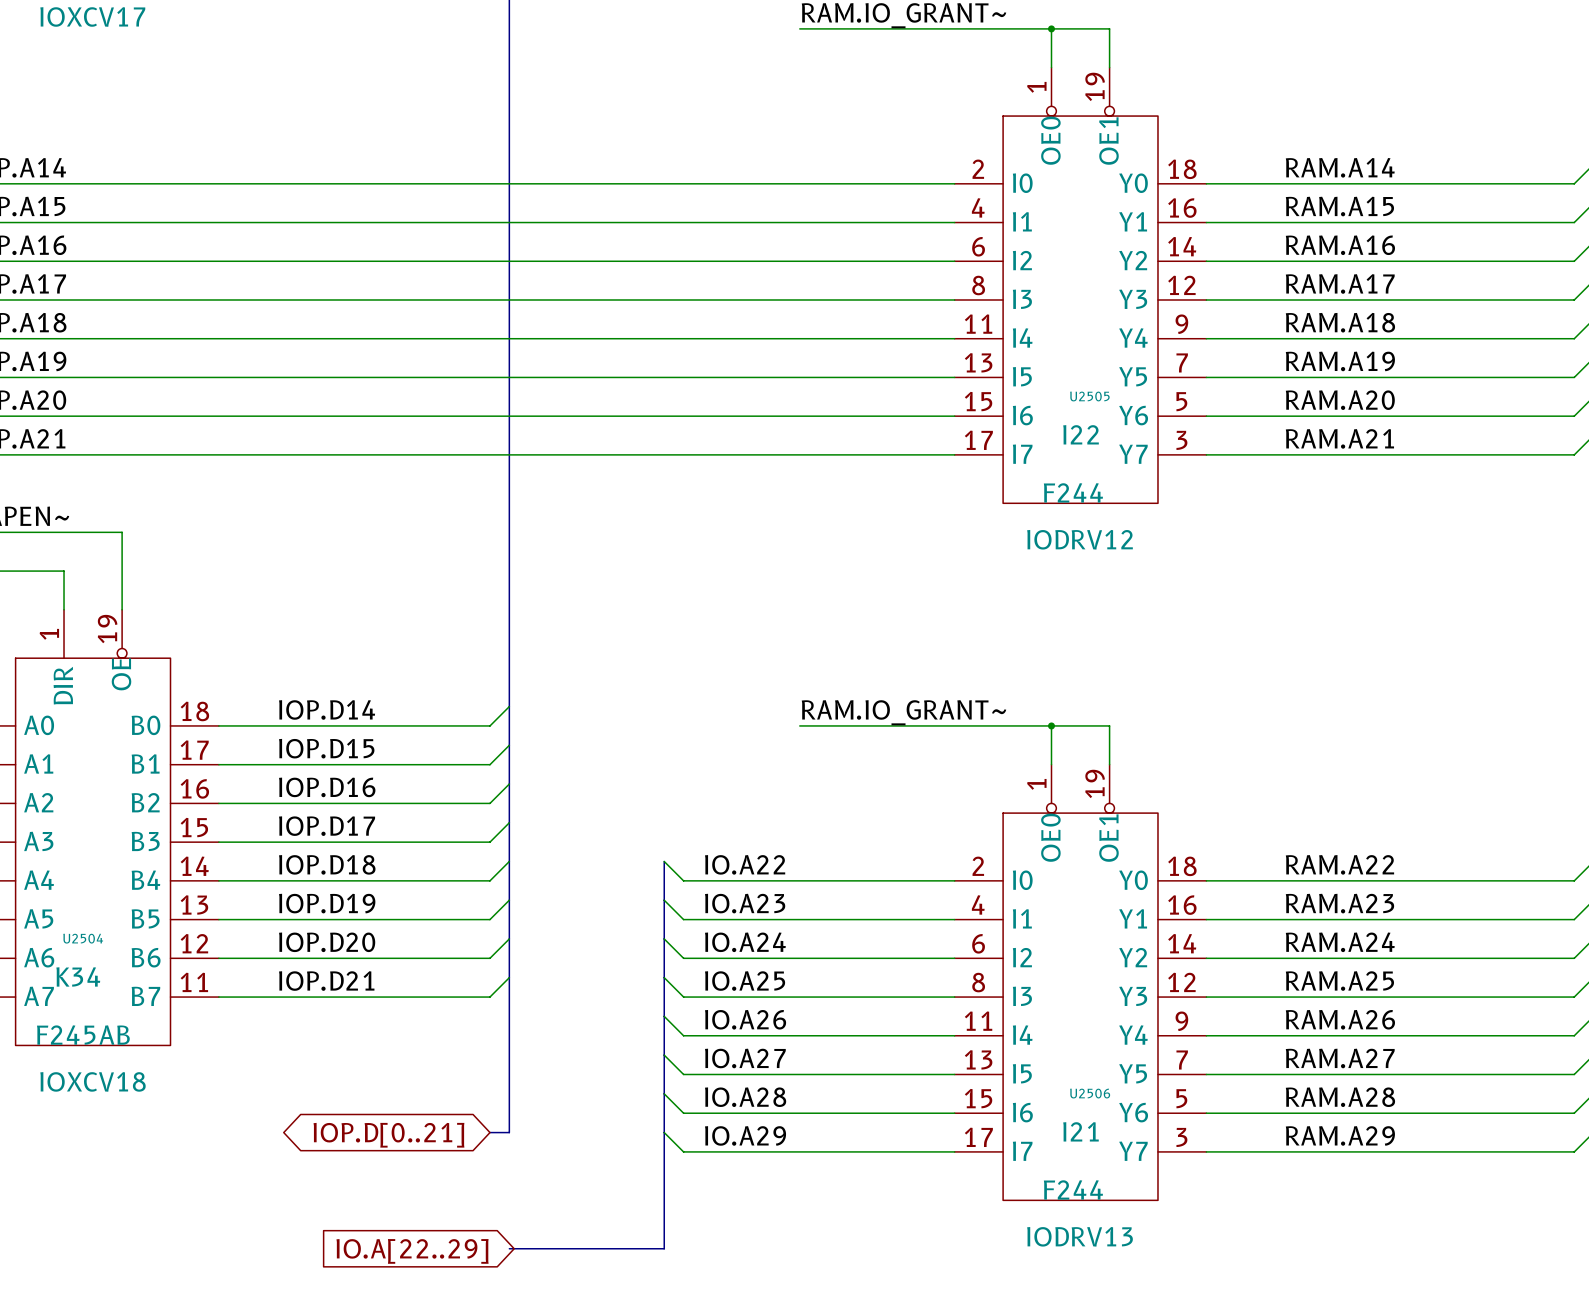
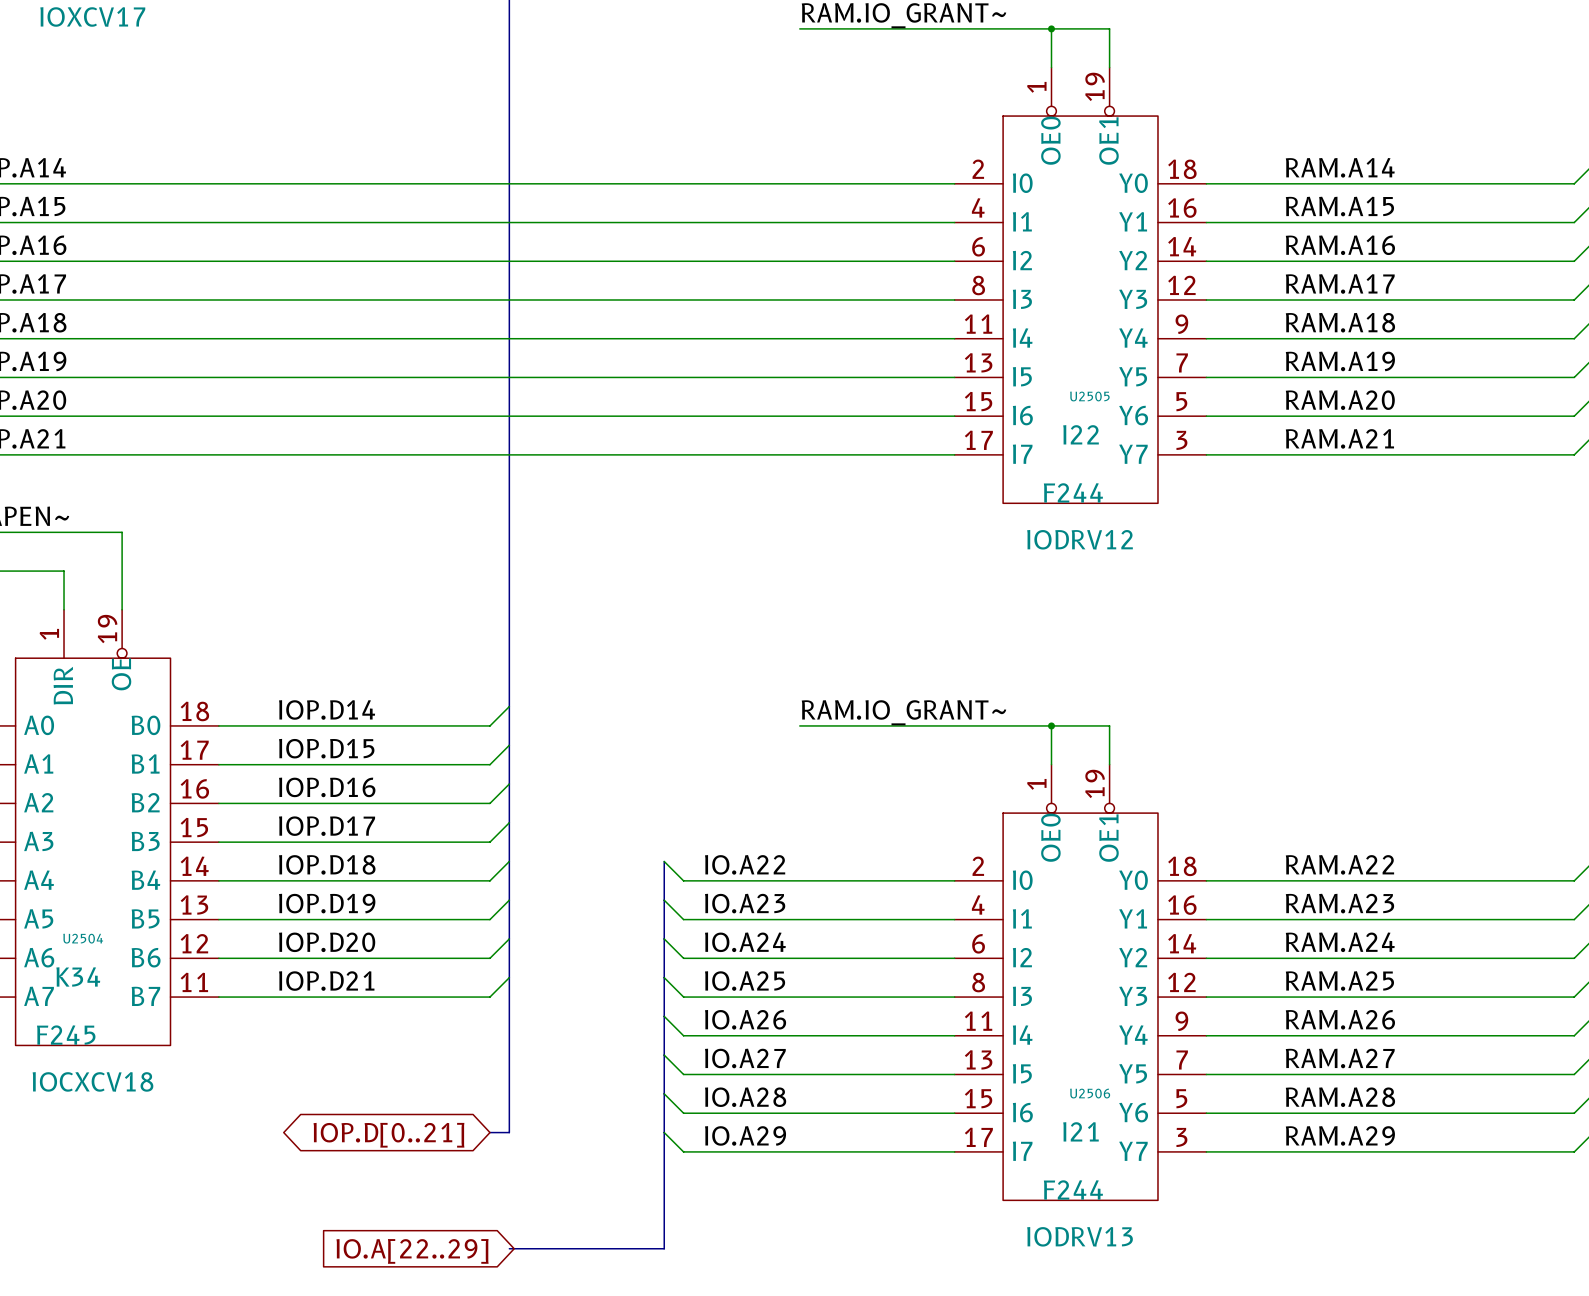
U2504 value: F245AB (83, 1035) -> F245 (66, 1035)
U2504 text: IOXCV18 (93, 1081) -> IOCXCV18 (93, 1081)

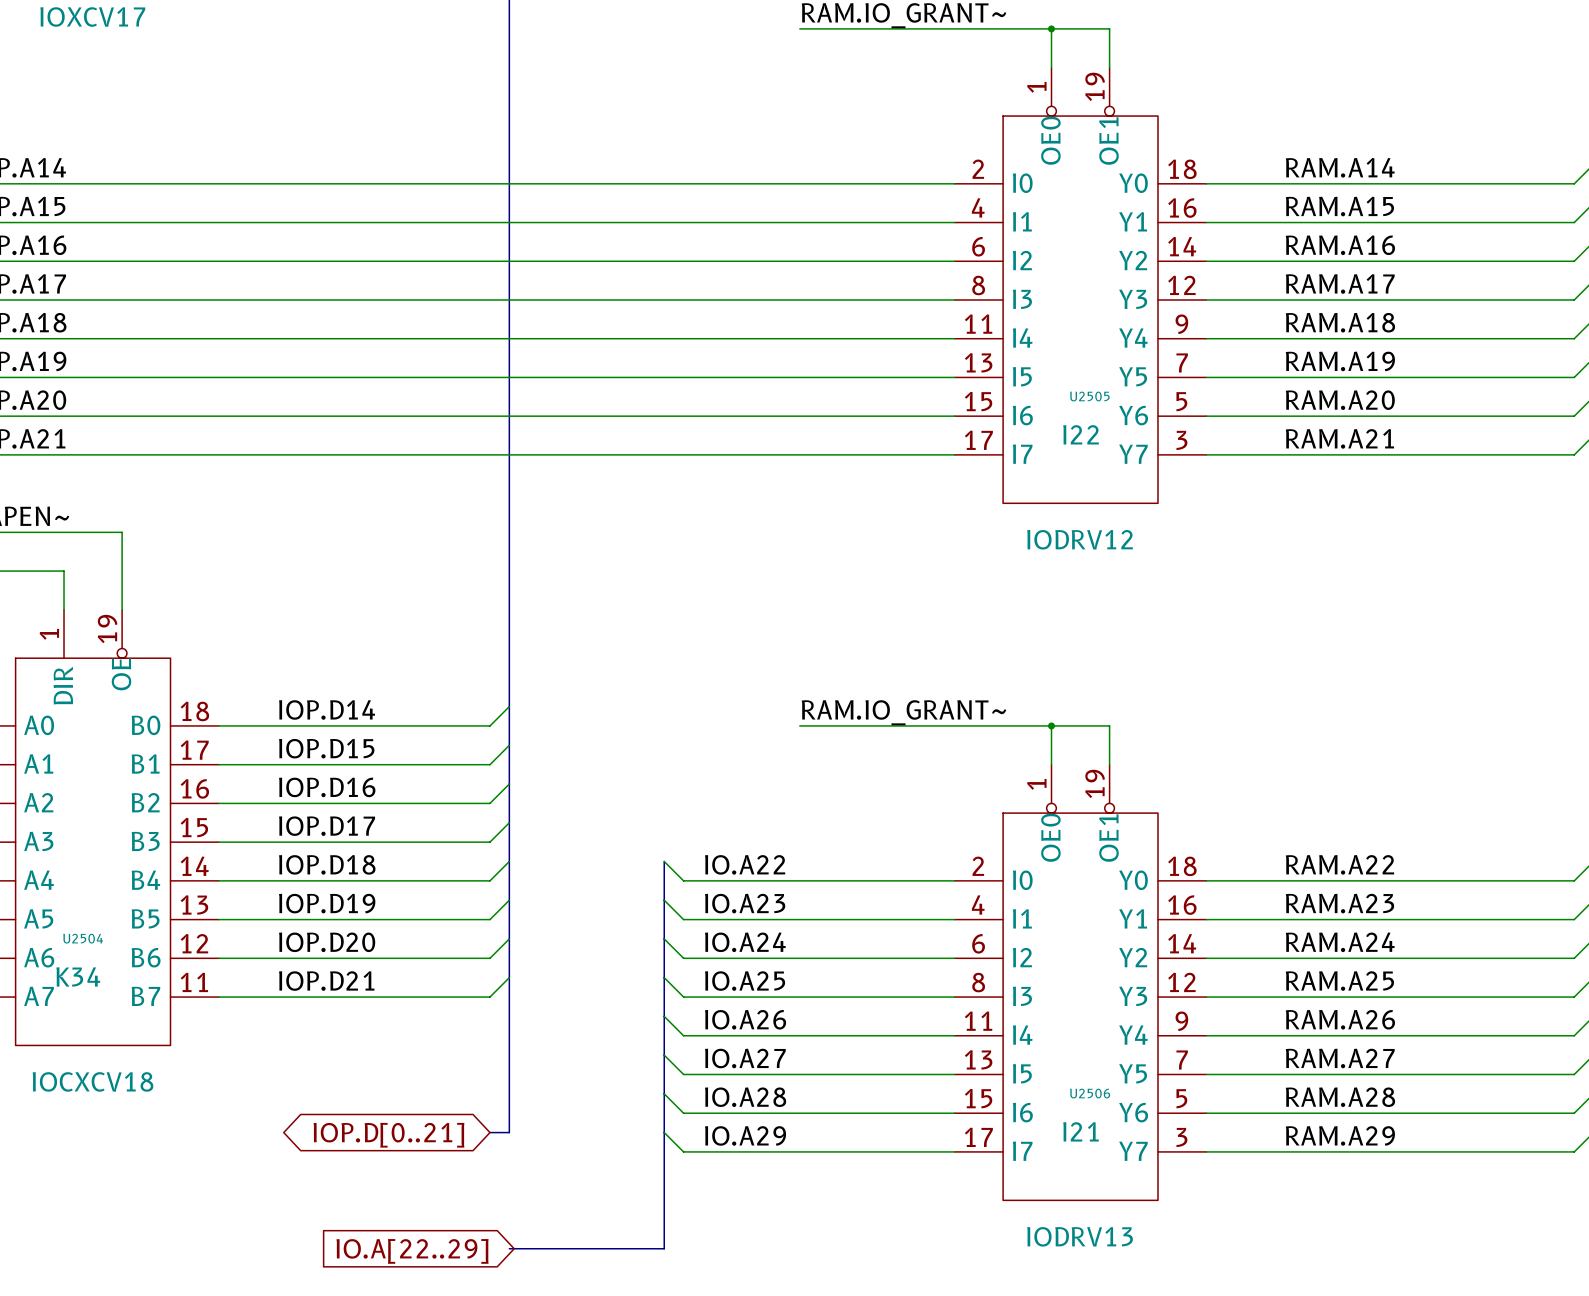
U2505 value: F244 (1073, 492) -> none
U2504 value: F245 (66, 1035) -> none
U2506 value: F244 (1073, 1189) -> none

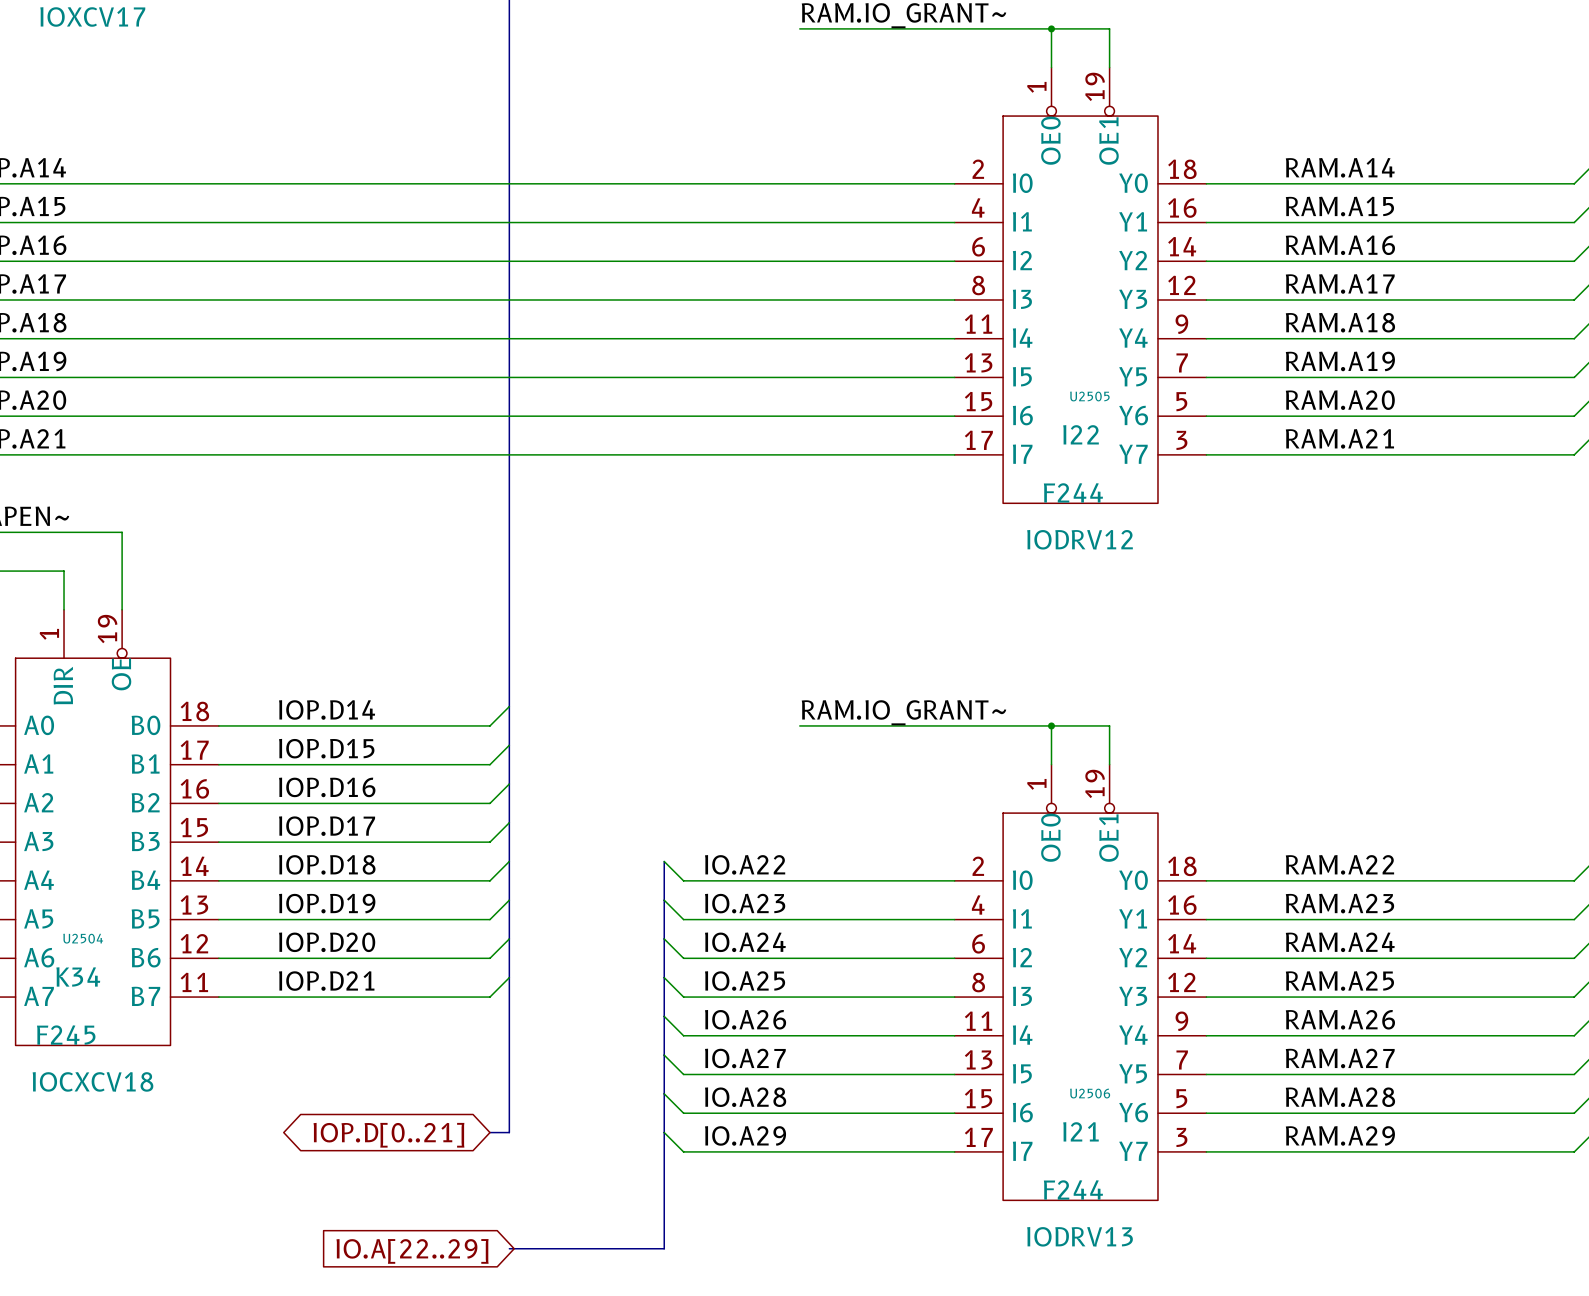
U2505 value: none -> F244 (1073, 492)
U2504 value: none -> F245 (66, 1035)
U2506 value: none -> F244 (1073, 1189)

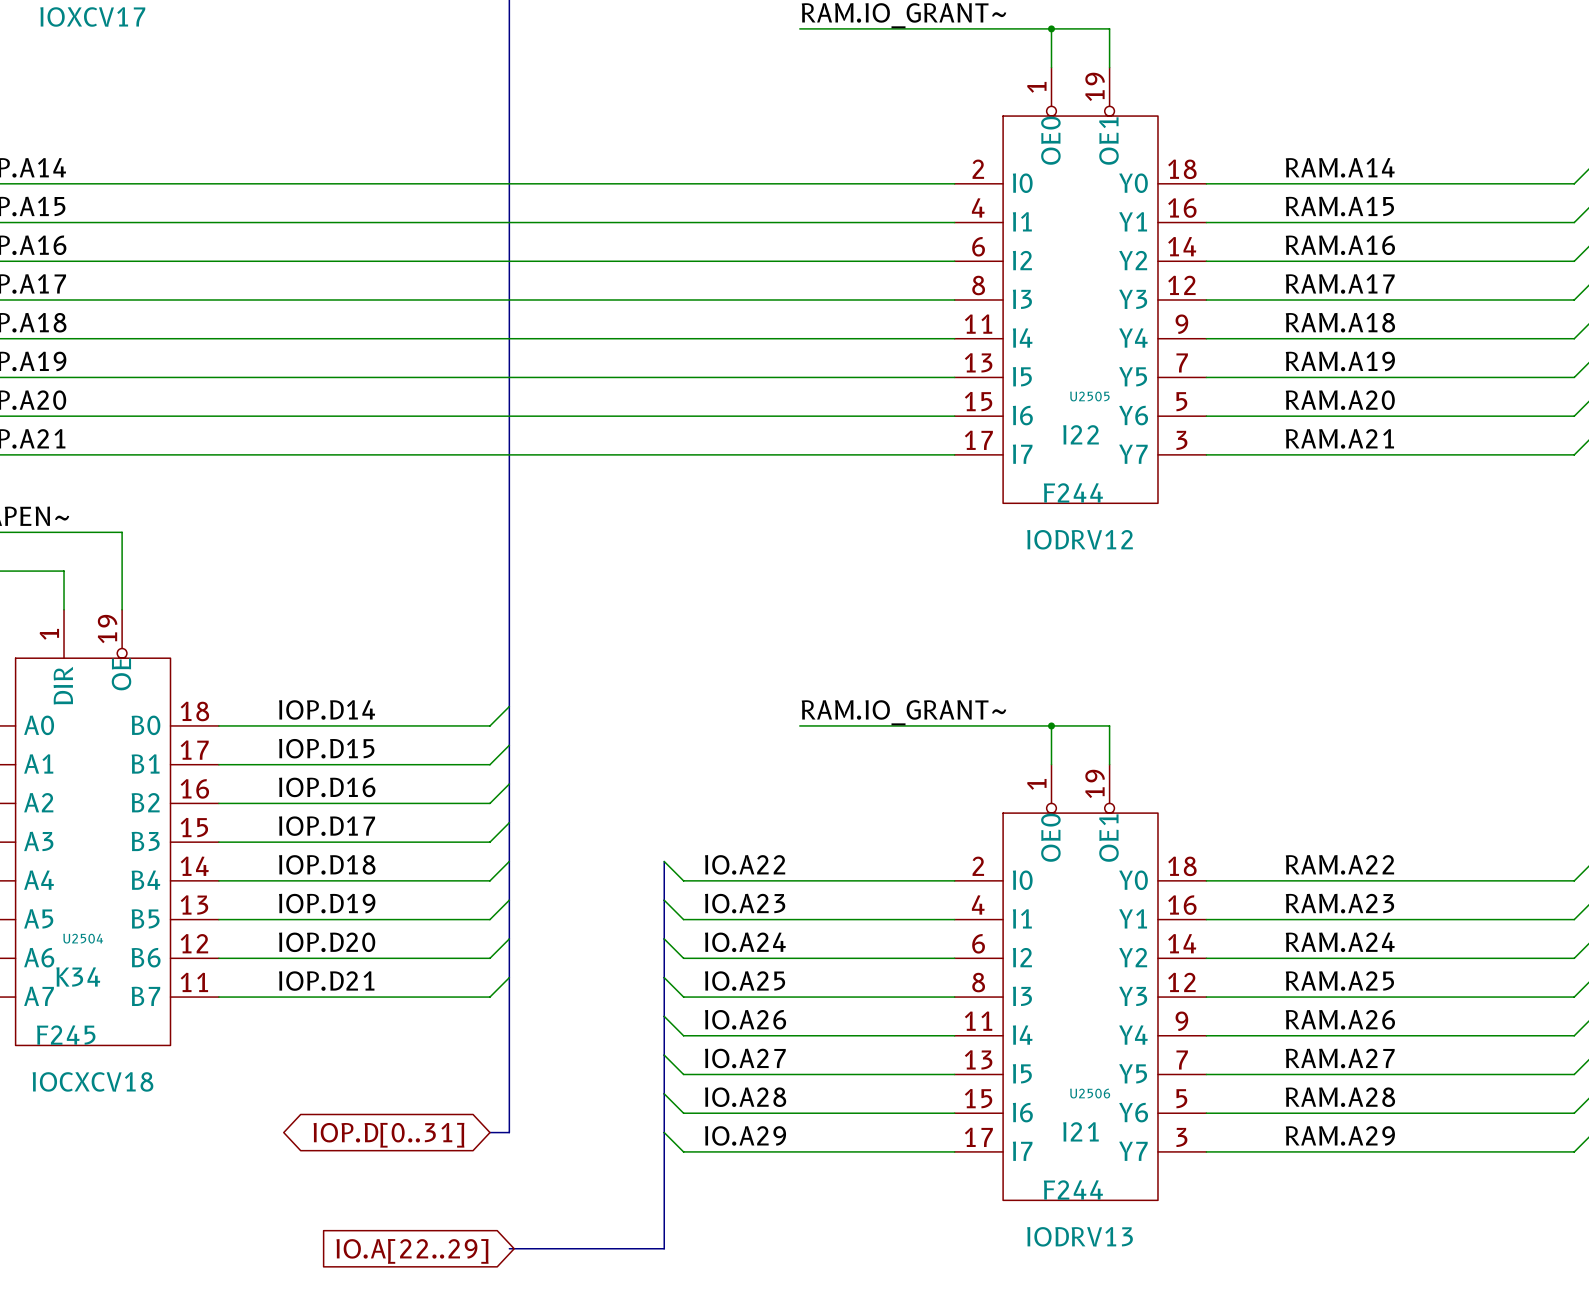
global label: IOP.D[0..21] (388, 1135) -> IOP.D[0..31] (388, 1135)

